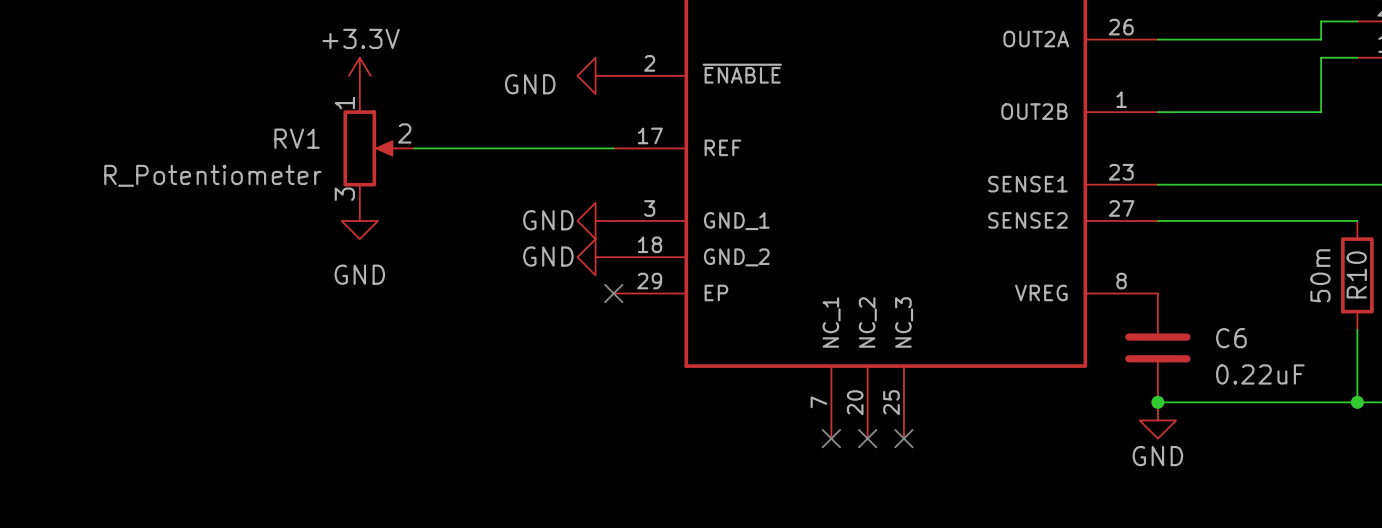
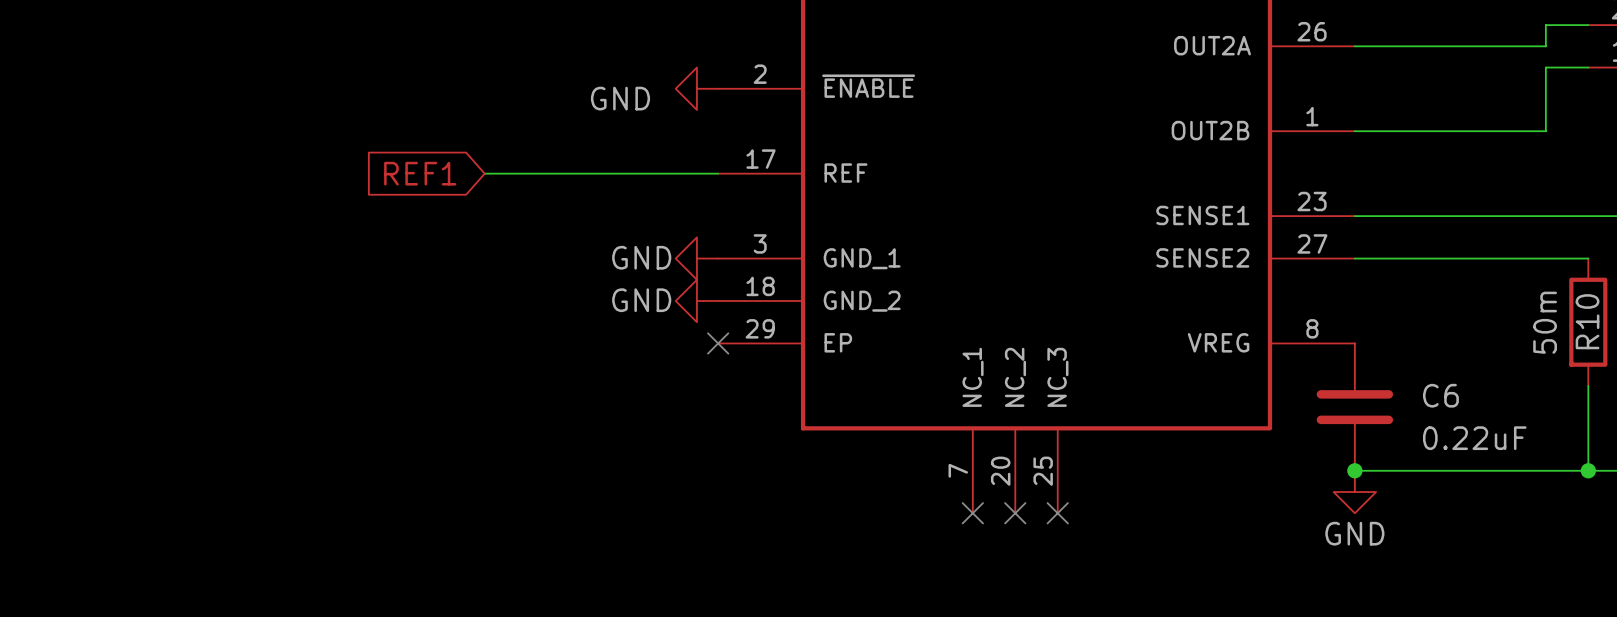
power symbol: +3.3V (359, 75) -> none
global label: none -> REF1 (420, 173)
RV1: R_Potentiometer (378, 148) -> none
power symbol: GND (359, 220) -> none

